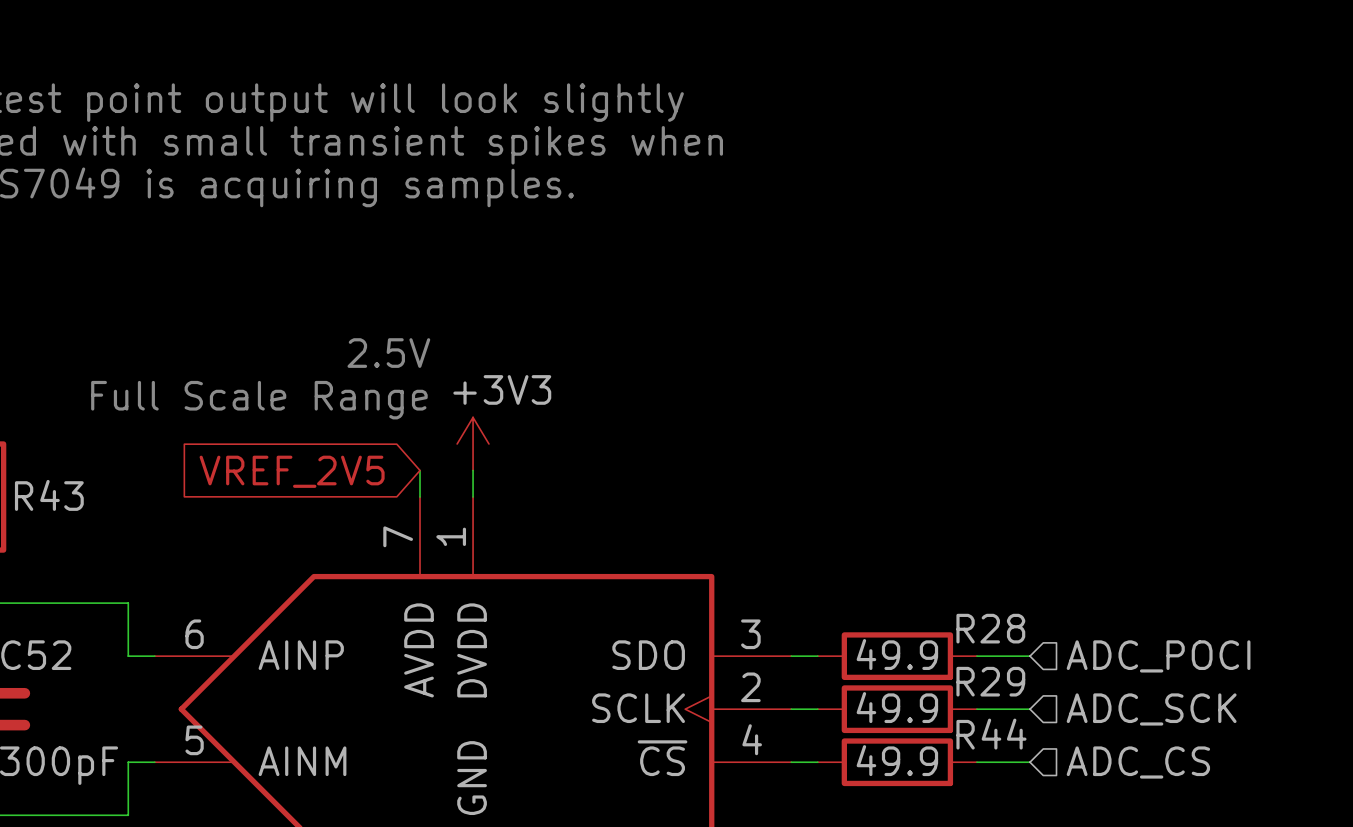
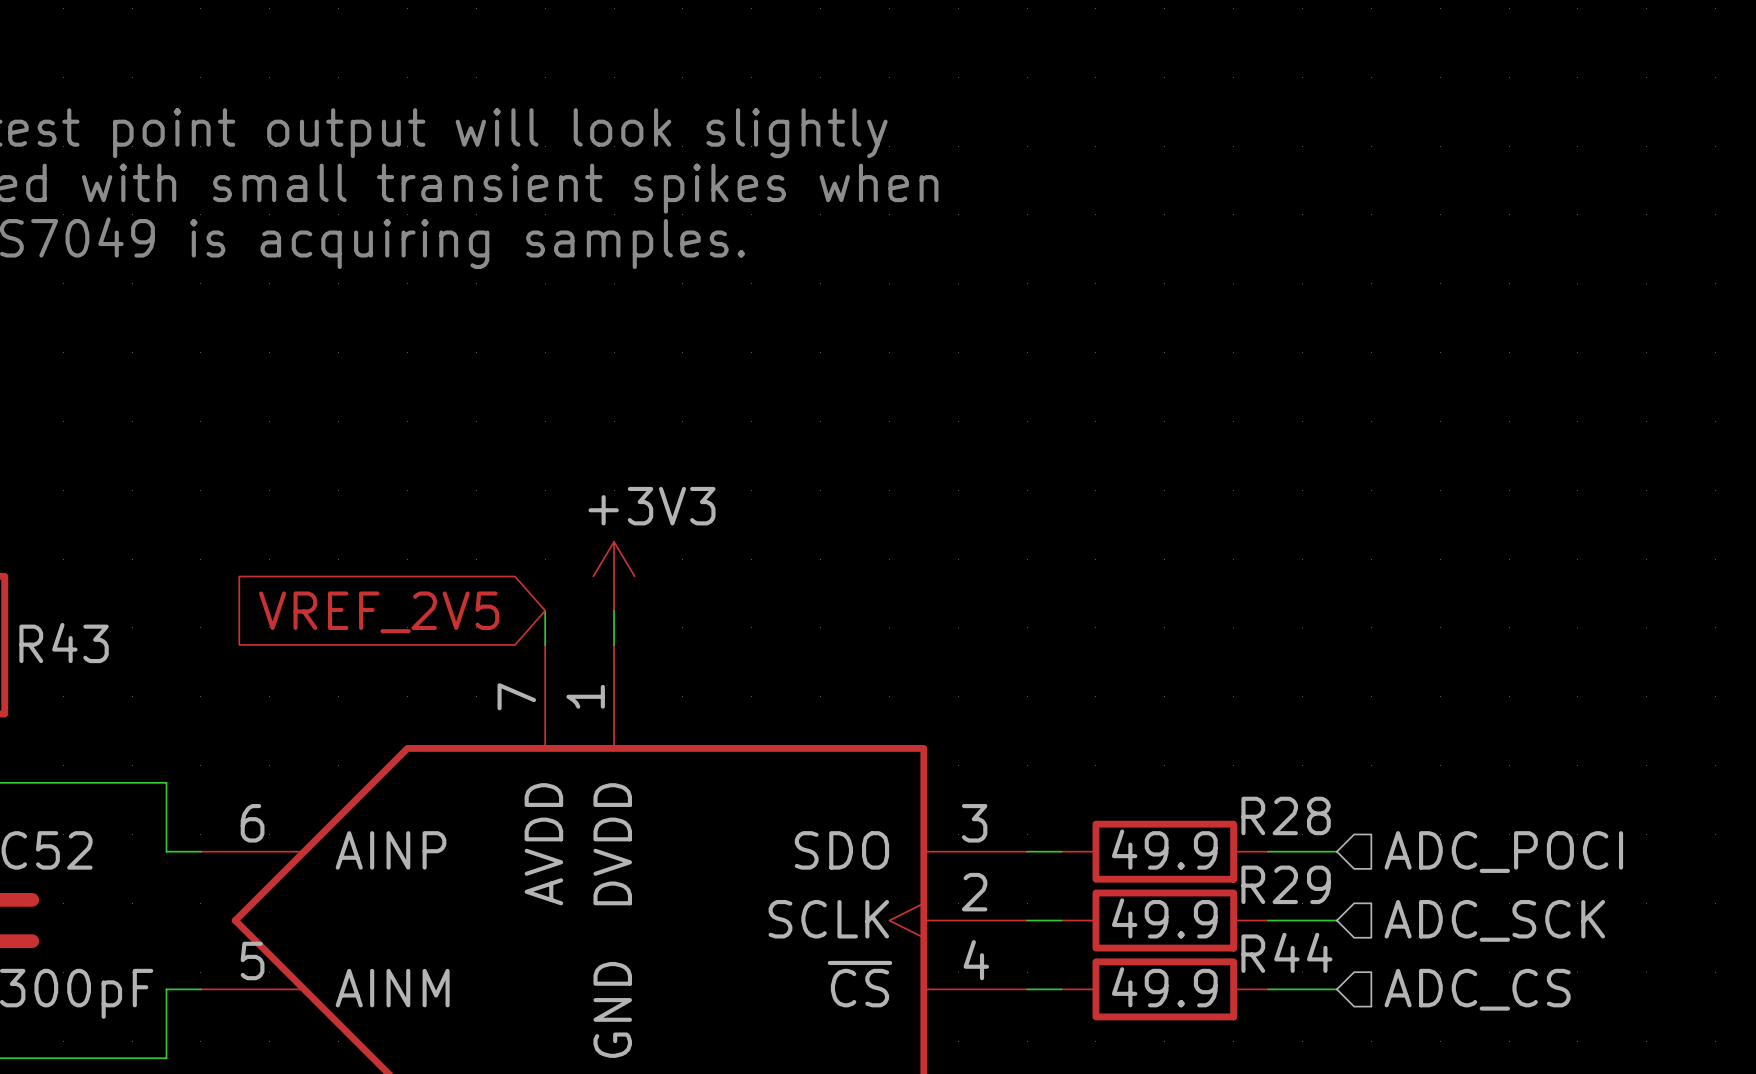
text: 2.5V (388, 353) -> none
text: Full Scale Range (259, 400) -> none

